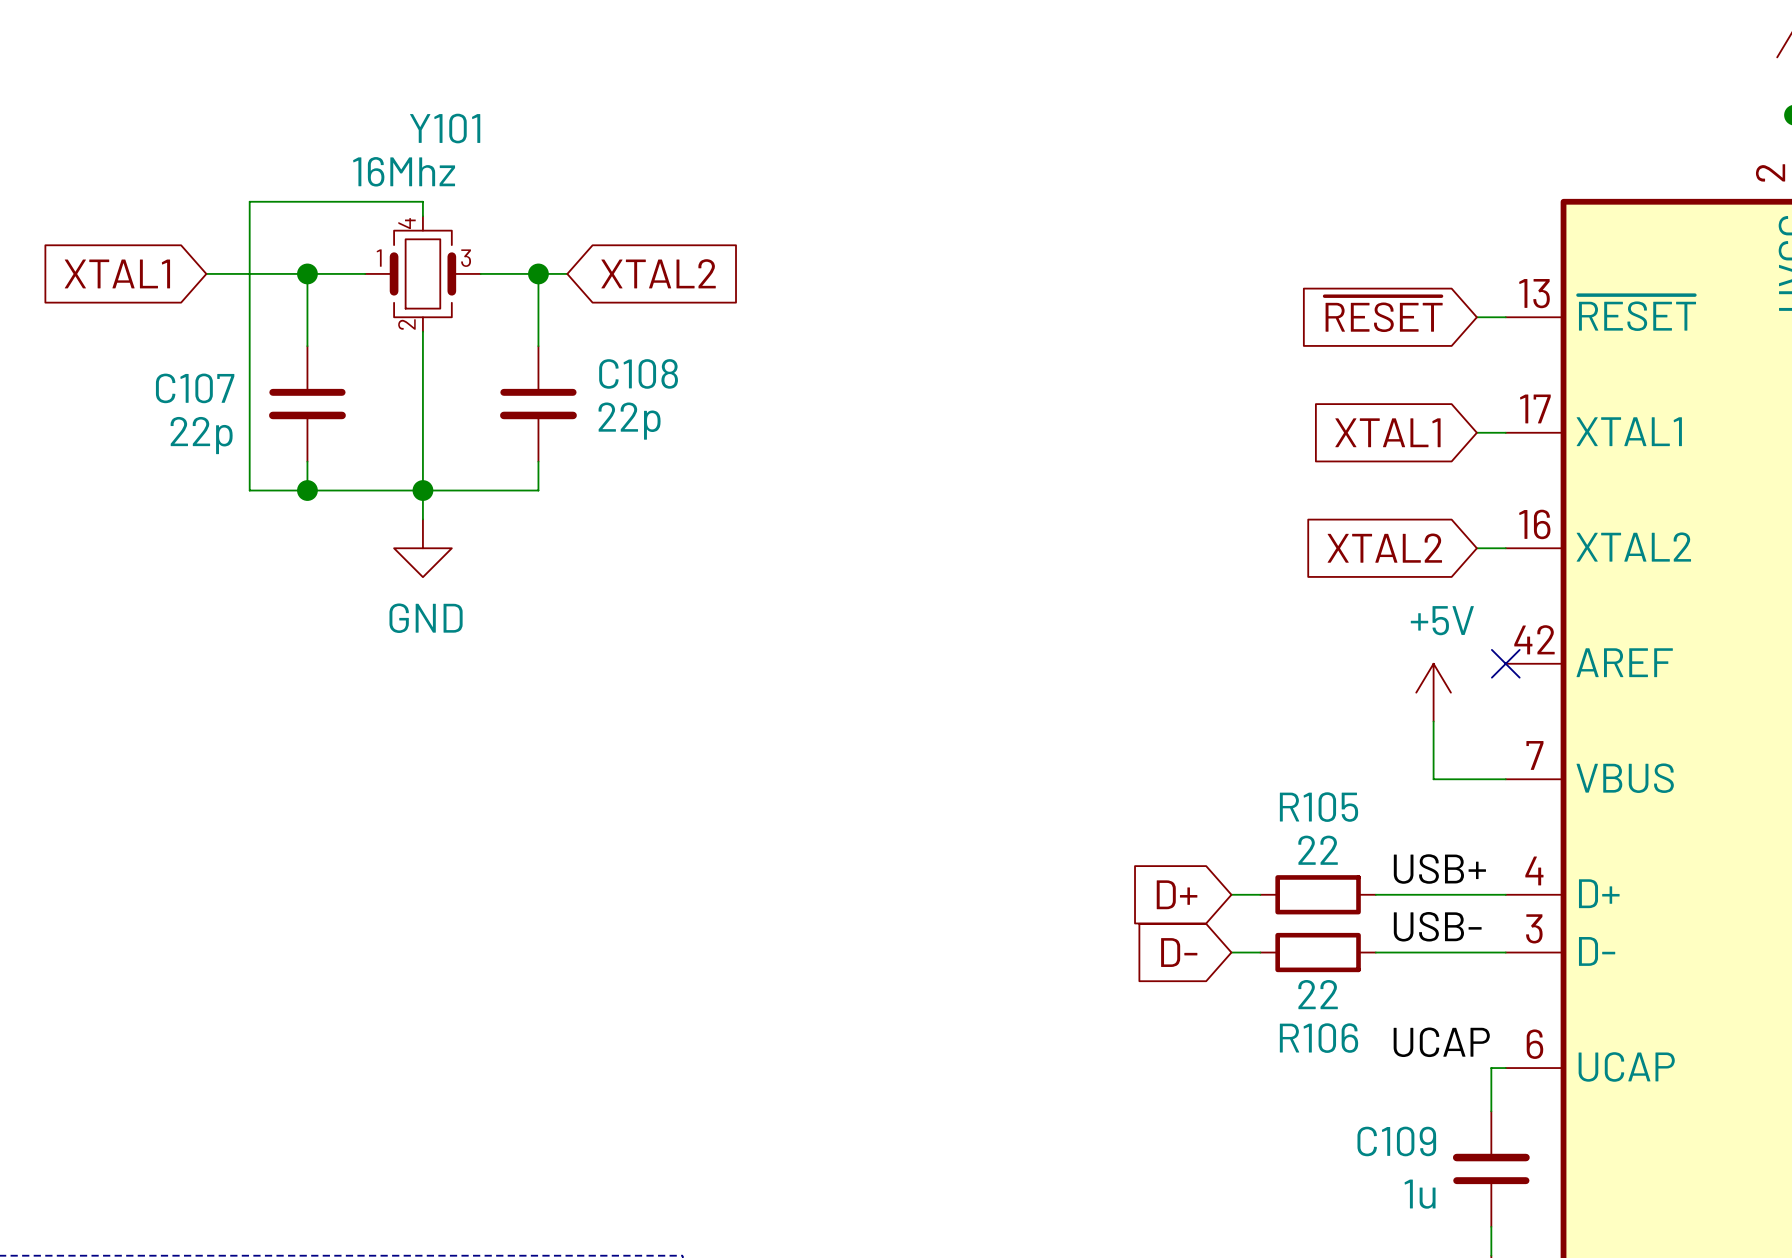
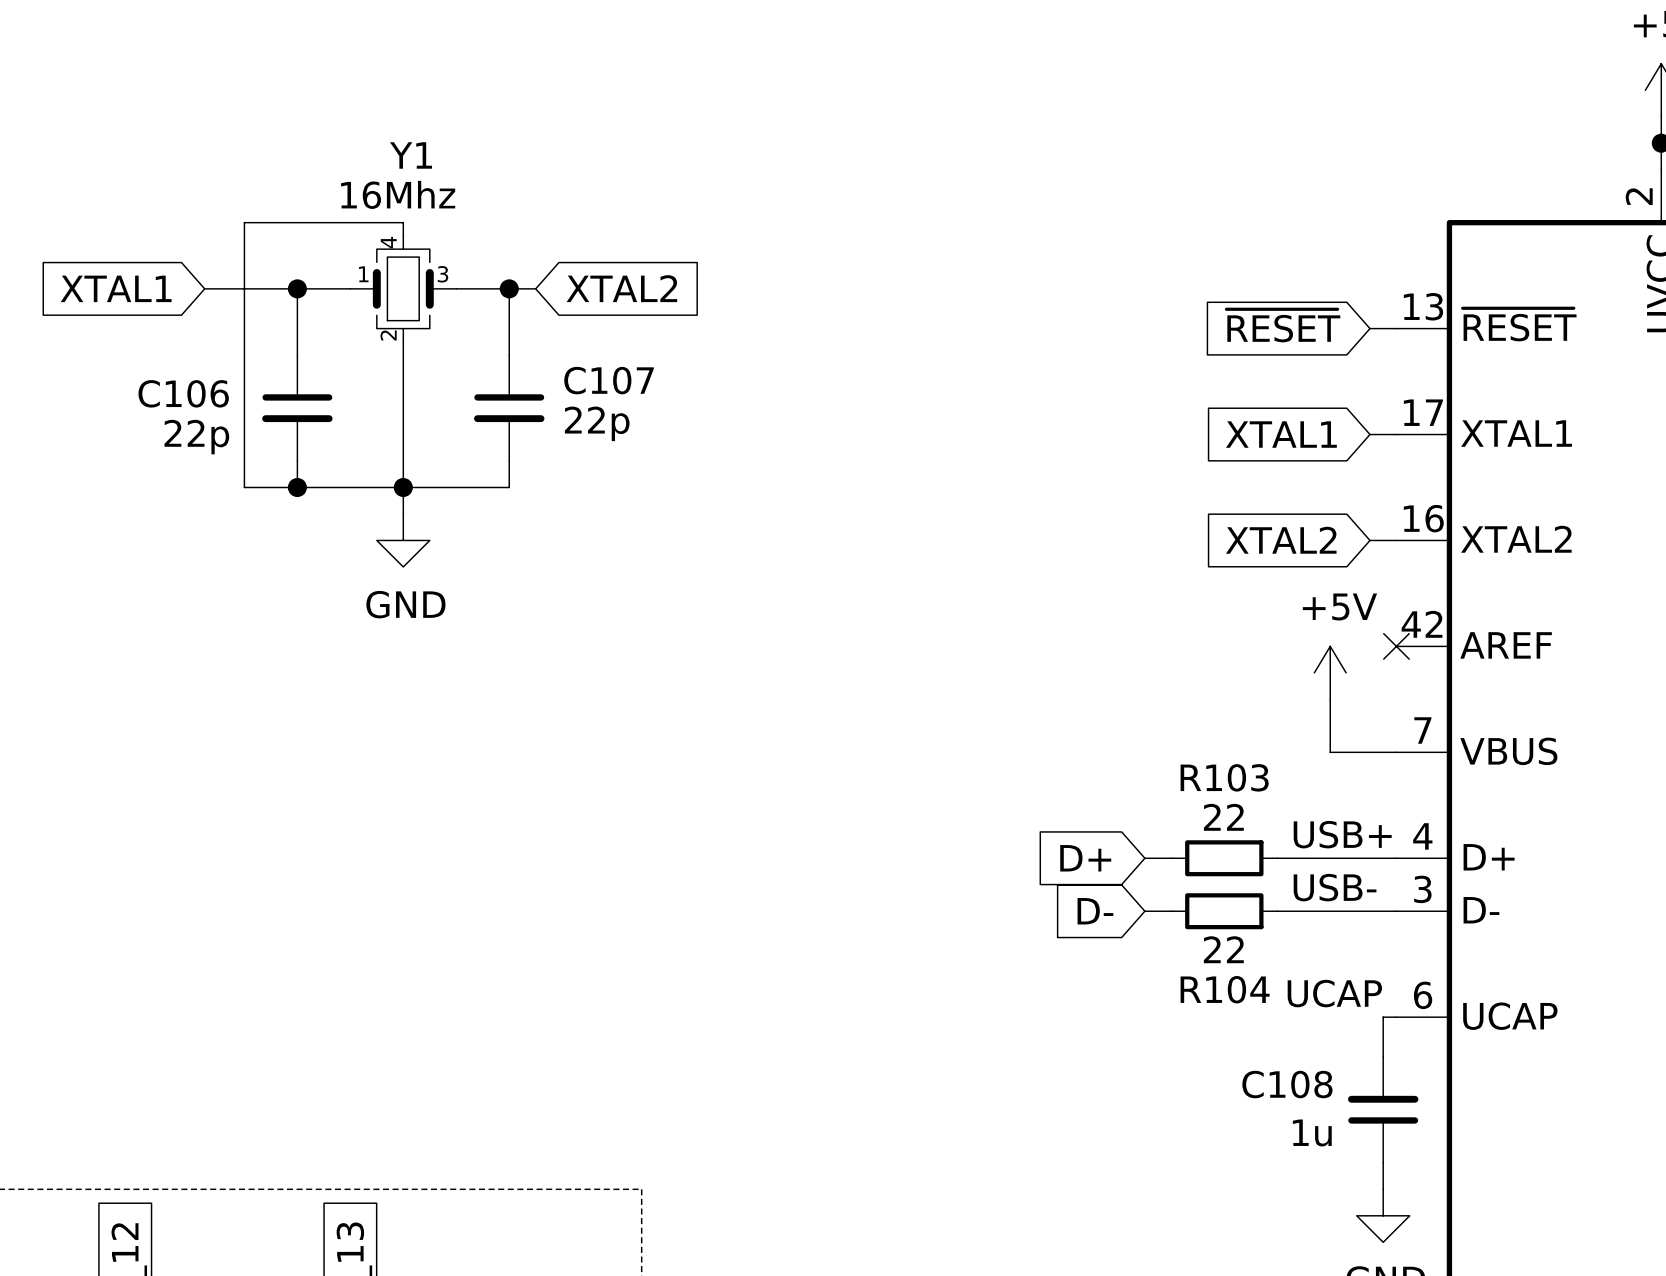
Y101 name: Y101 (445, 128) -> Y1 (411, 155)
C108 name: C108 (638, 373) -> C107 (609, 380)
C107 name: C107 (195, 388) -> C106 (183, 393)
R105 name: R105 (1319, 807) -> R103 (1224, 777)
R106 name: R106 (1319, 1038) -> R104 (1225, 989)
C109 name: C109 (1396, 1141) -> C108 (1287, 1084)

